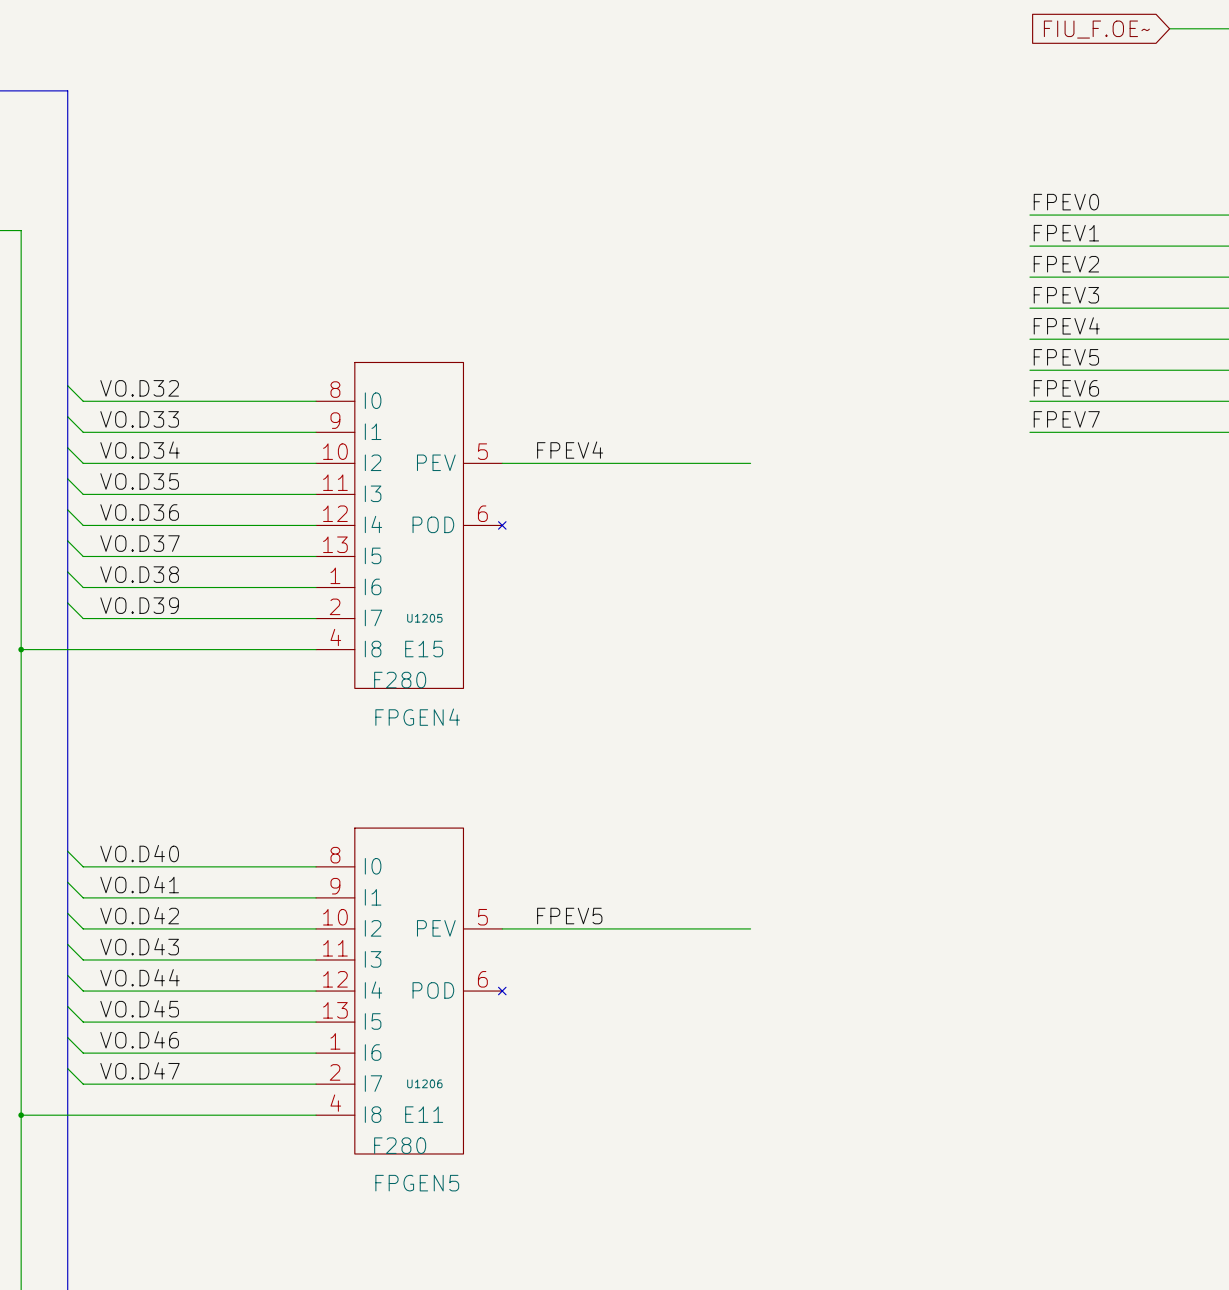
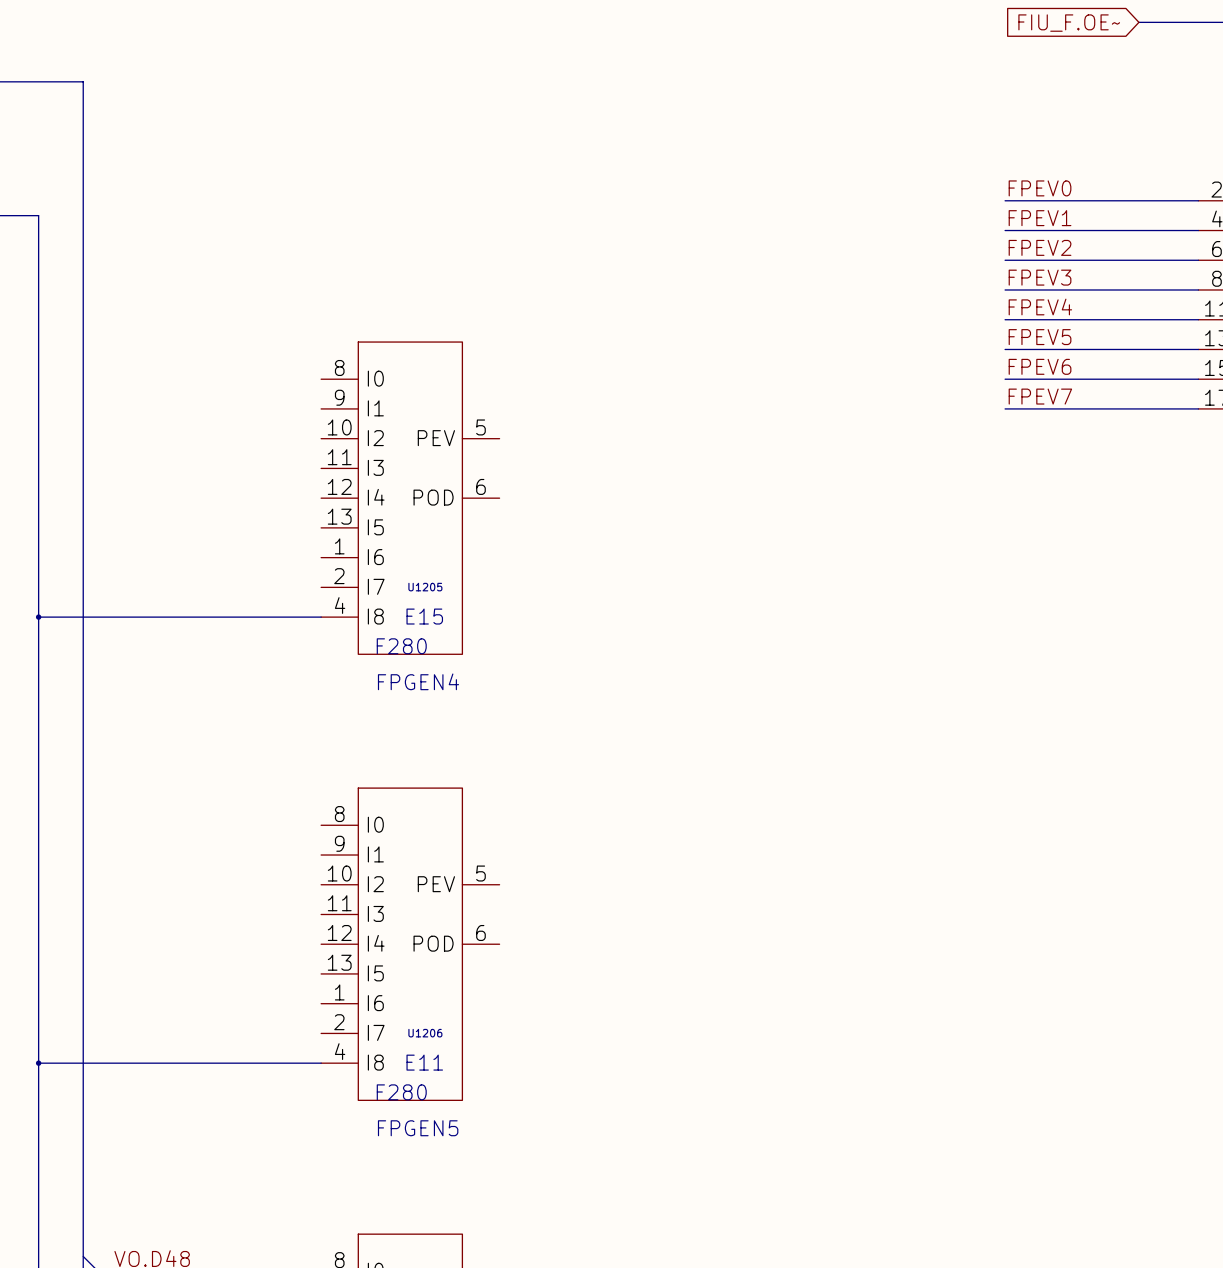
wire: (67, 385) (83, 401) (316, 401) -> none
label: VO.D32 (139, 388) -> none
wire: (67, 416) (83, 432) (316, 432) -> none
label: VO.D33 (139, 419) -> none
wire: (67, 447) (83, 463) (316, 463) -> none
label: VO.D34 (140, 450) -> none
label: FPEV4 (570, 450) -> none
wire: (502, 463) (750, 463) -> none
wire: (67, 478) (83, 494) (316, 494) -> none
label: VO.D35 (139, 481) -> none
wire: (67, 509) (83, 525) (316, 525) -> none
label: VO.D36 (139, 512) -> none
no-connect mark: (502, 525) -> none
wire: (67, 540) (83, 556) (316, 556) -> none
label: VO.D37 (140, 543) -> none
wire: (67, 572) (83, 587) (316, 587) -> none
label: VO.D38 (139, 574) -> none
wire: (67, 603) (83, 618) (316, 618) -> none
label: VO.D39 (139, 605) -> none
wire: (67, 851) (83, 866) (316, 866) -> none
label: VO.D40 (139, 853) -> none
wire: (67, 882) (83, 897) (316, 897) -> none
label: VO.D41 (139, 884) -> none
wire: (67, 913) (83, 928) (316, 928) -> none
label: VO.D42 (139, 915) -> none
label: FPEV5 (569, 916) -> none
wire: (502, 928) (750, 928) -> none
wire: (67, 944) (83, 959) (316, 959) -> none
label: VO.D43 (139, 946) -> none
wire: (67, 975) (83, 991) (316, 991) -> none
label: VO.D44 (140, 977) -> none
no-connect mark: (502, 991) -> none
wire: (67, 1006) (83, 1022) (316, 1022) -> none
label: VO.D45 (139, 1008) -> none
wire: (67, 1037) (83, 1053) (316, 1053) -> none
label: VO.D46 (139, 1039) -> none
wire: (67, 1068) (83, 1084) (316, 1084) -> none
label: VO.D47 (140, 1070) -> none

